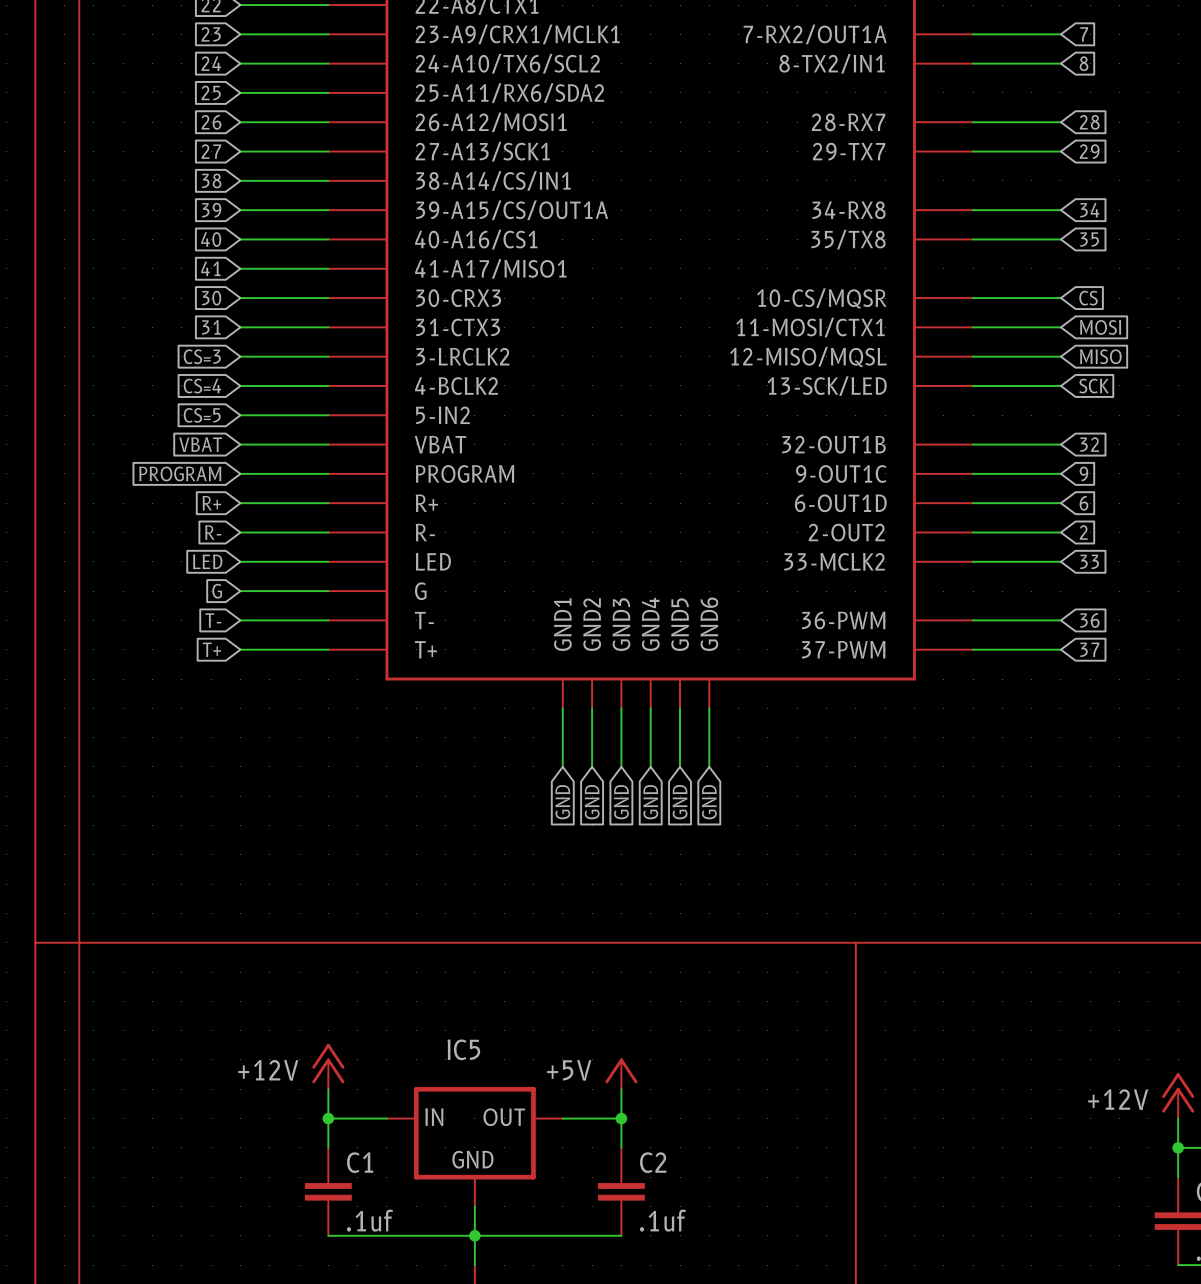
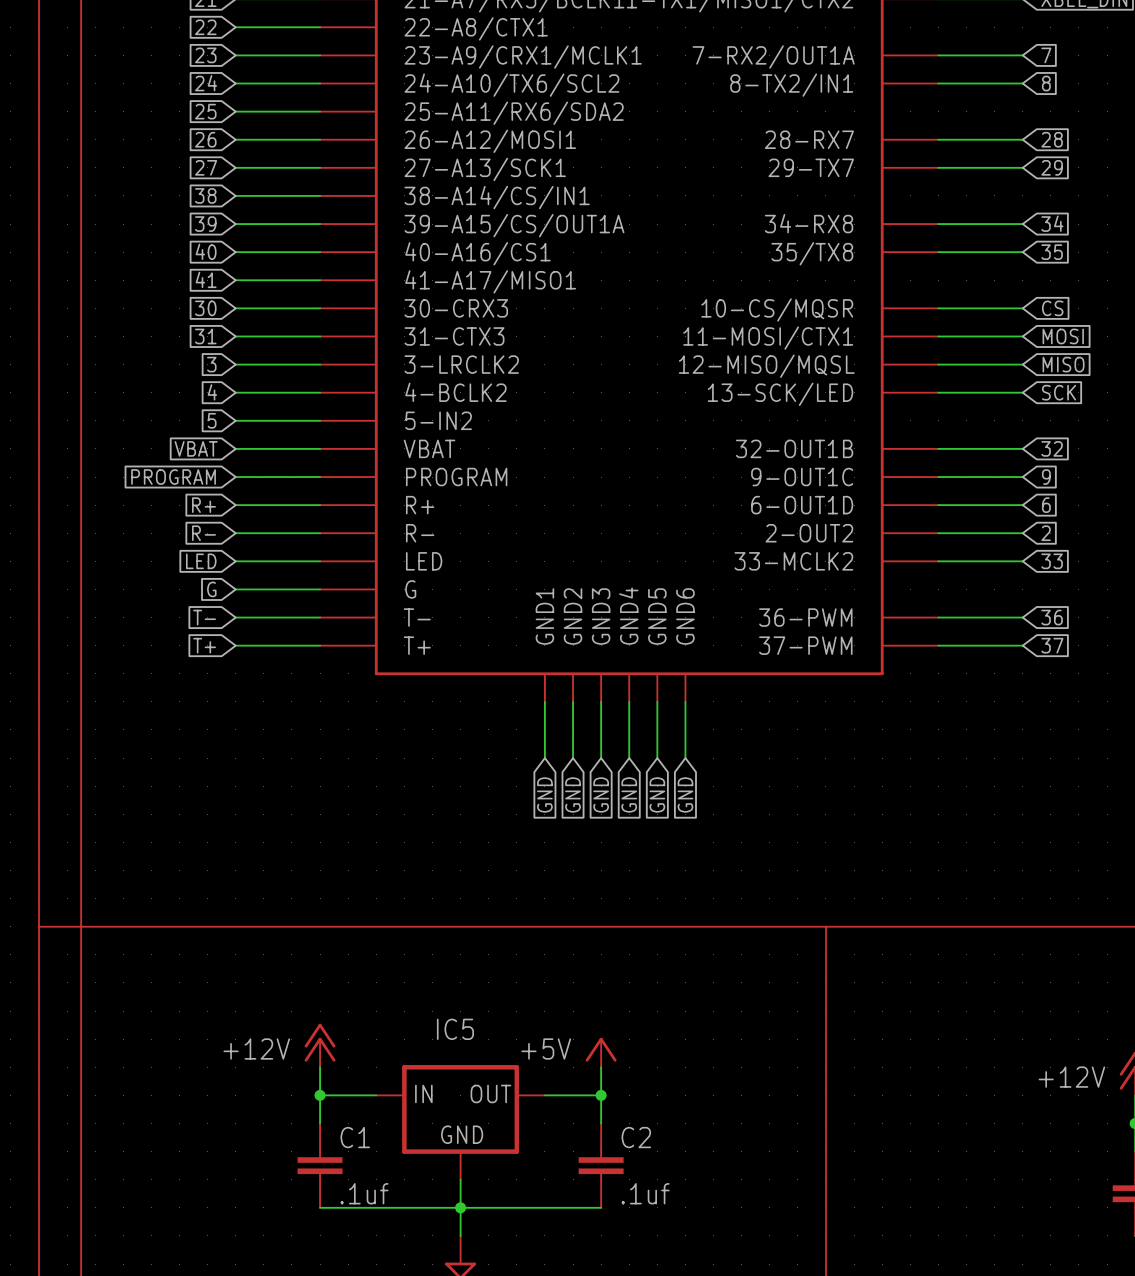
global label: CS=3 (202, 356) -> 3 (211, 364)
global label: CS=4 (202, 386) -> 4 (212, 392)
global label: CS=5 (202, 415) -> 5 (212, 420)

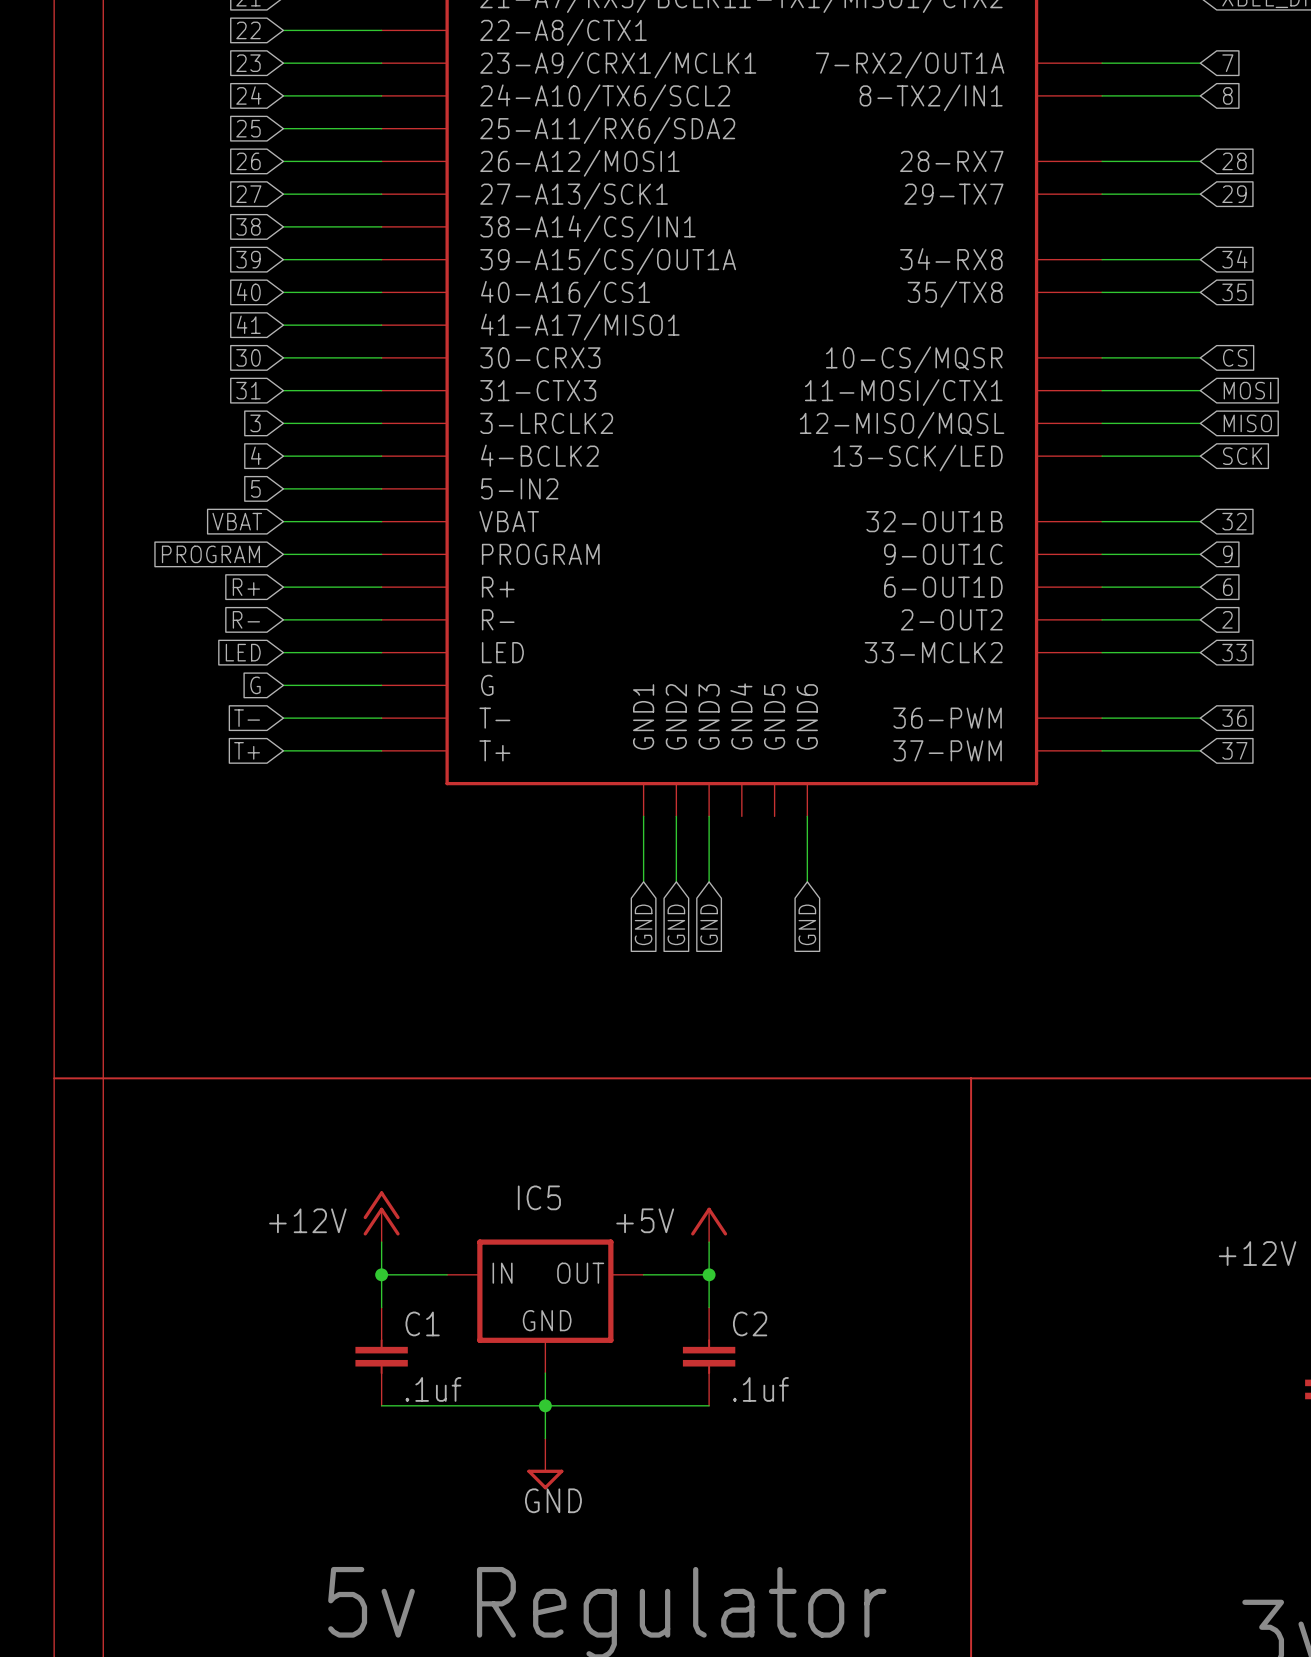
wire: (629, 701) (629, 758) -> none
wire: (657, 701) (657, 758) -> none
global label: GND (629, 794) -> none
global label: GND (657, 794) -> none

